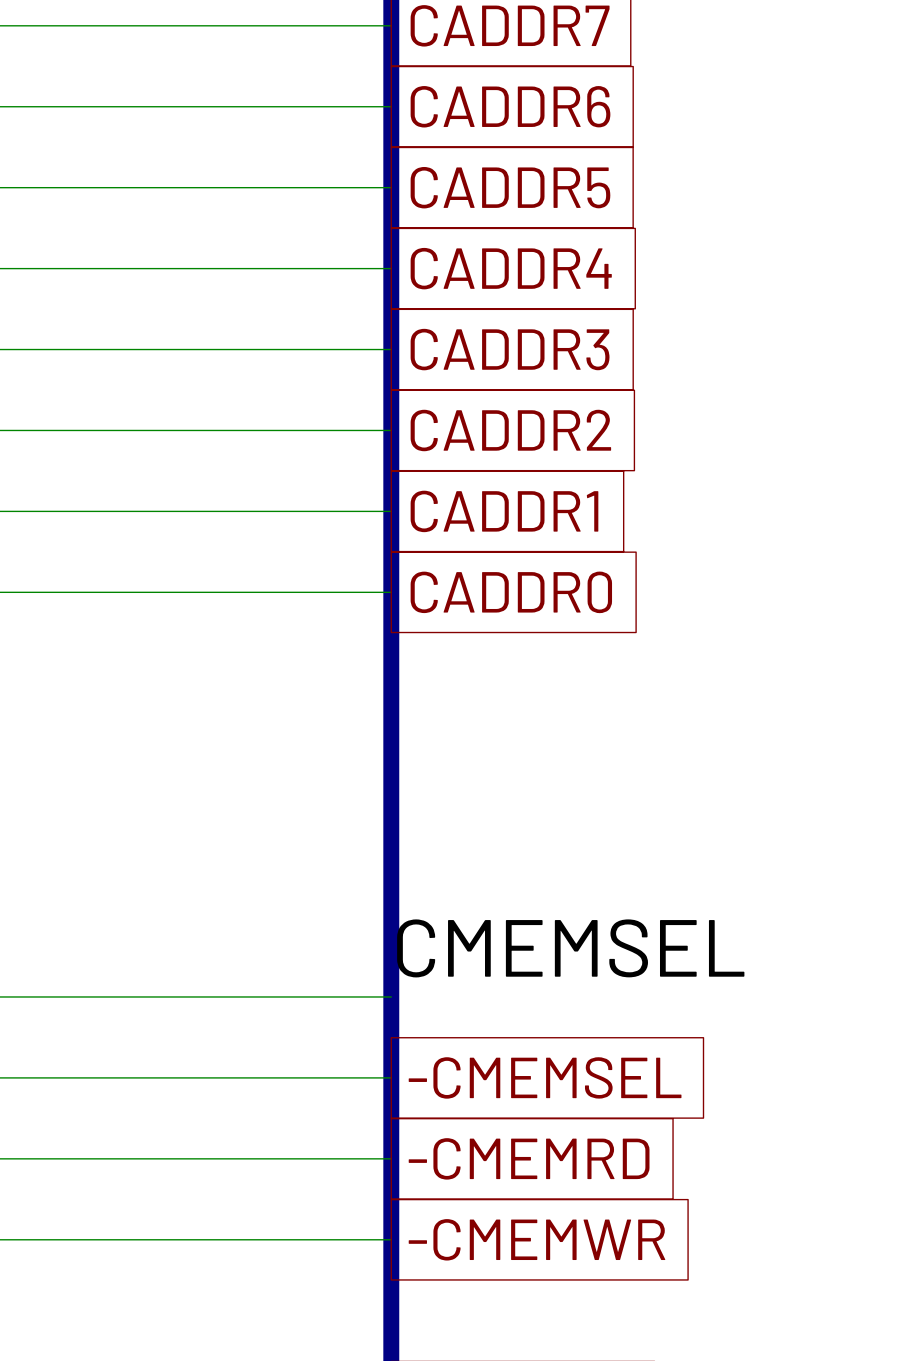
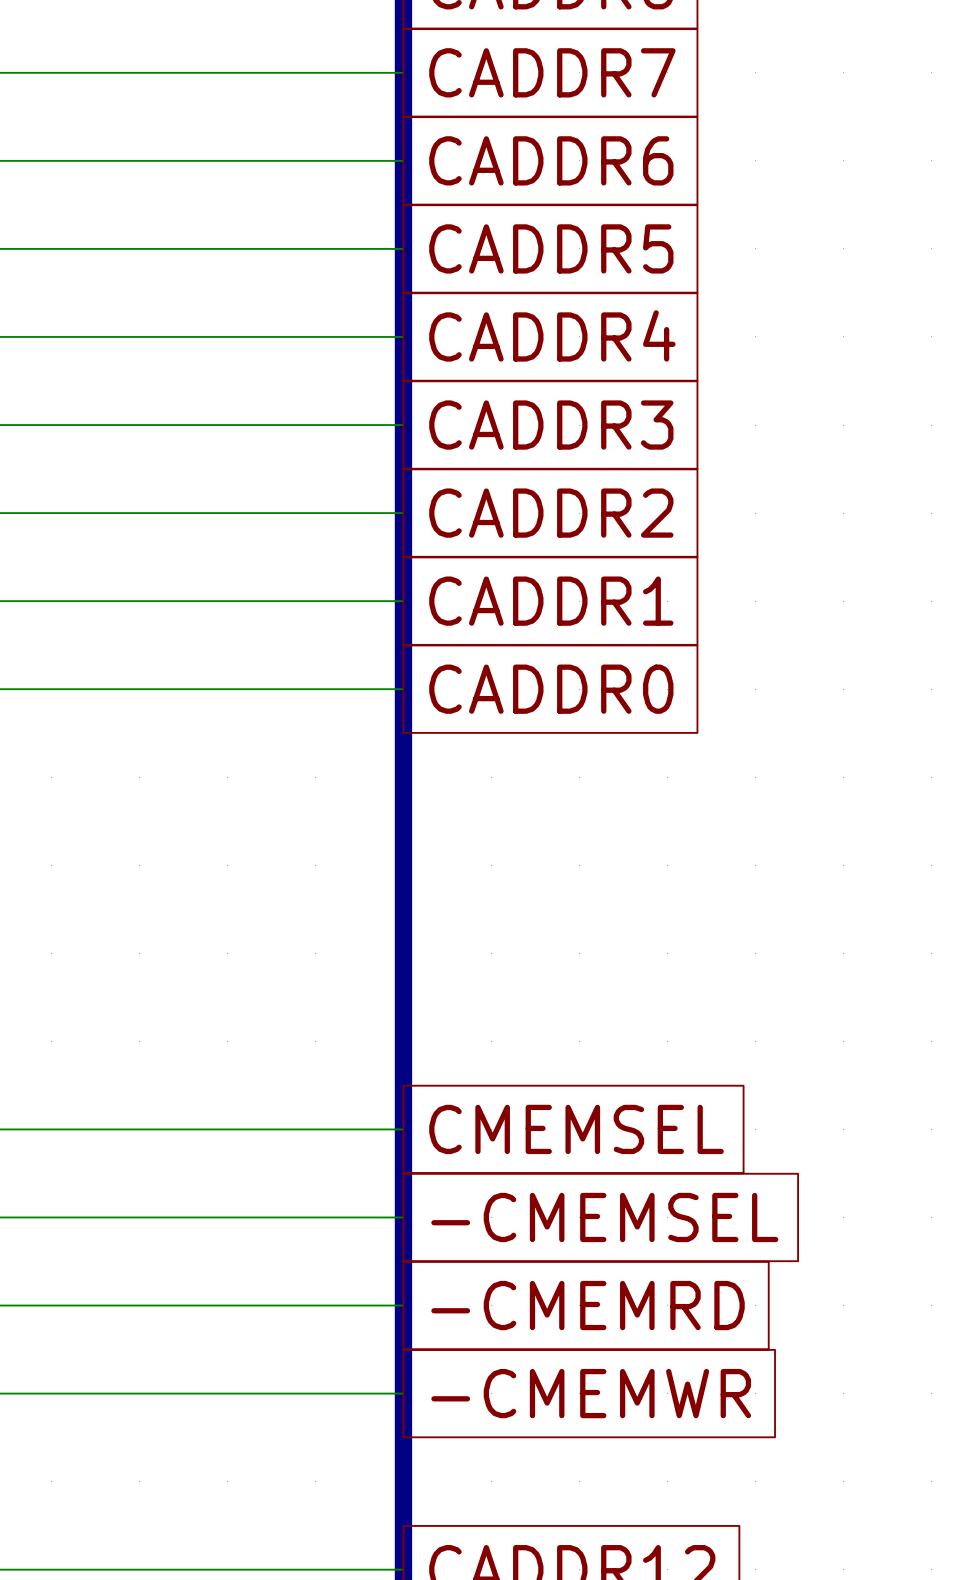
label: CMEMSEL (570, 948) -> none
global label: none -> CMEMSEL (576, 1129)

